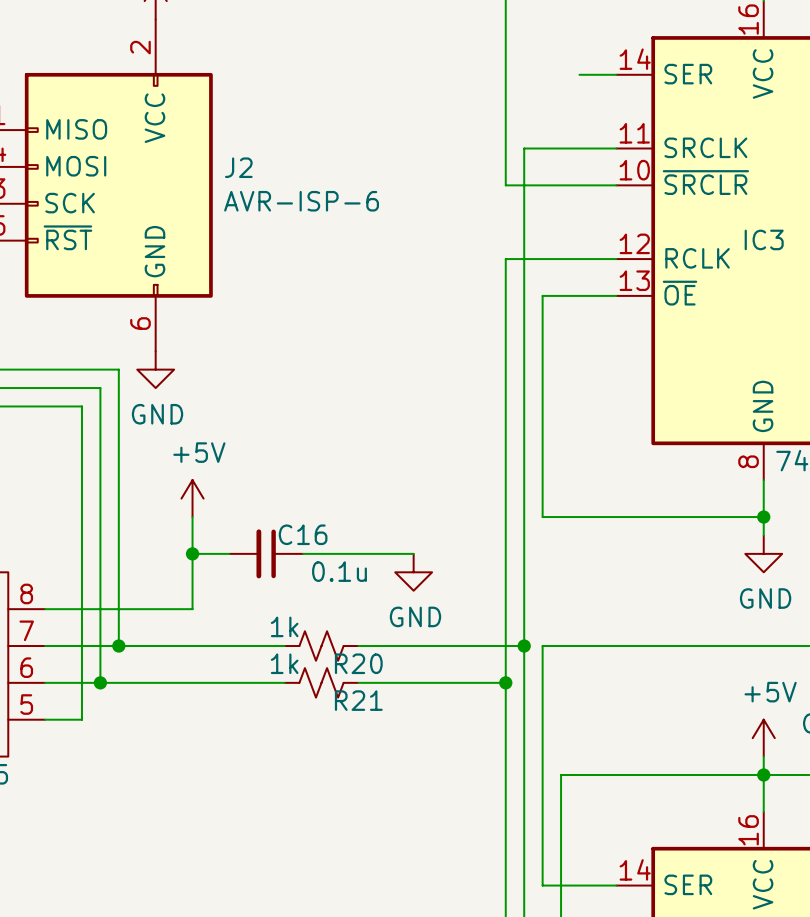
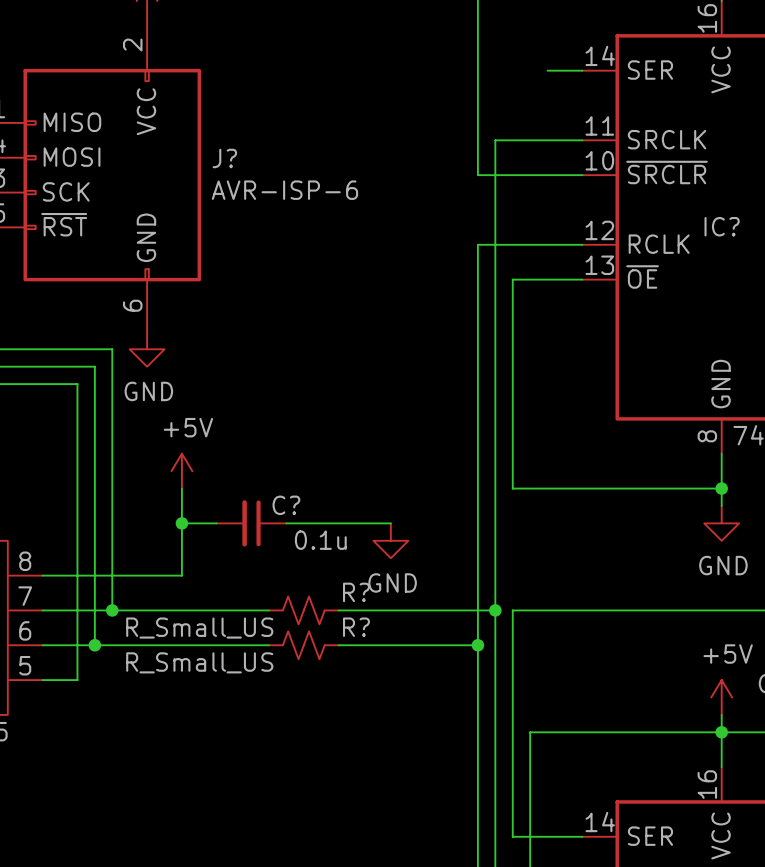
J2 name: J2 (238, 167) -> J? (224, 158)
IC3 name: IC3 (764, 239) -> IC? (722, 226)
C16 name: C16 (303, 534) -> C? (286, 505)
R20 value: 1k (284, 626) -> R_Small_US (199, 628)
R21 value: 1k (284, 663) -> R_Small_US (199, 662)
R20 name: R20 (358, 663) -> R? (356, 592)
R21 name: R21 (358, 700) -> R? (356, 627)

